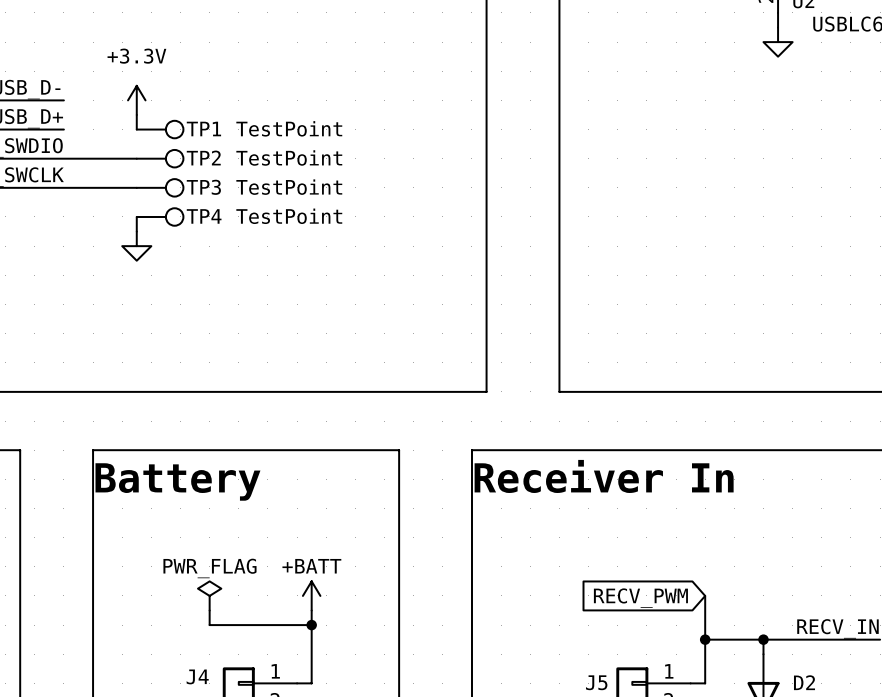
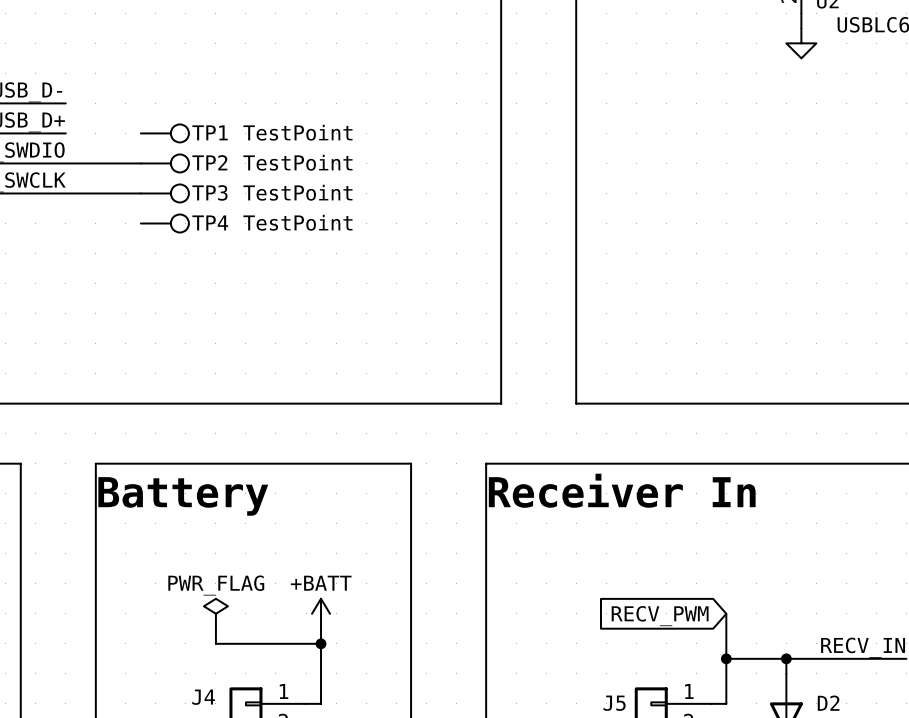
power symbol: +3.3V (136, 100) -> none
wire: (136, 114) (136, 129) -> none
wire: (136, 216) (136, 231) -> none
power symbol: (136, 246) -> none

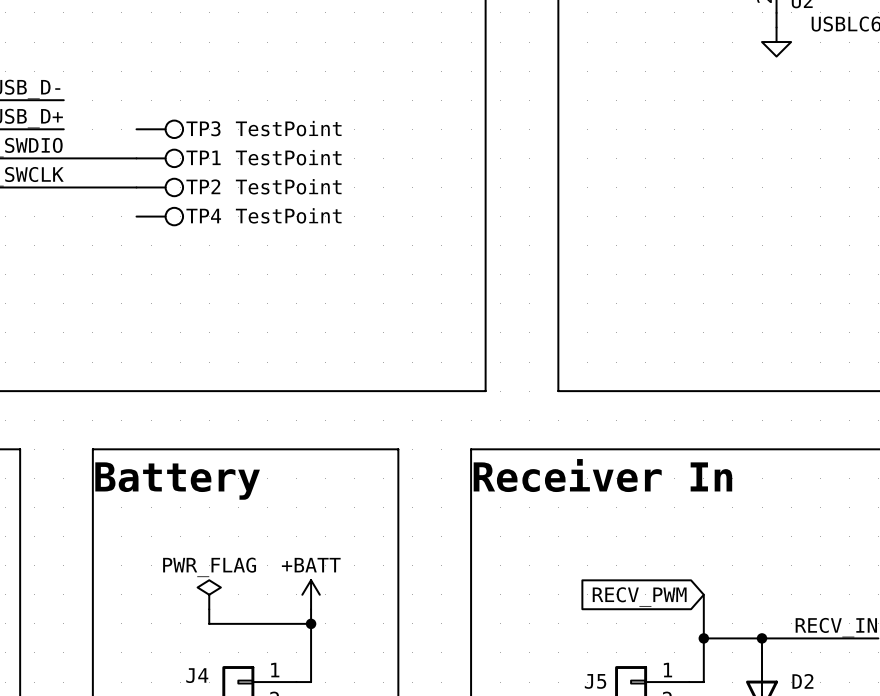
TP1 name: TP1 (210, 132) -> TP3 (203, 128)
TP2 name: TP2 (209, 162) -> TP1 (203, 157)
TP3 name: TP3 (209, 192) -> TP2 (203, 186)

